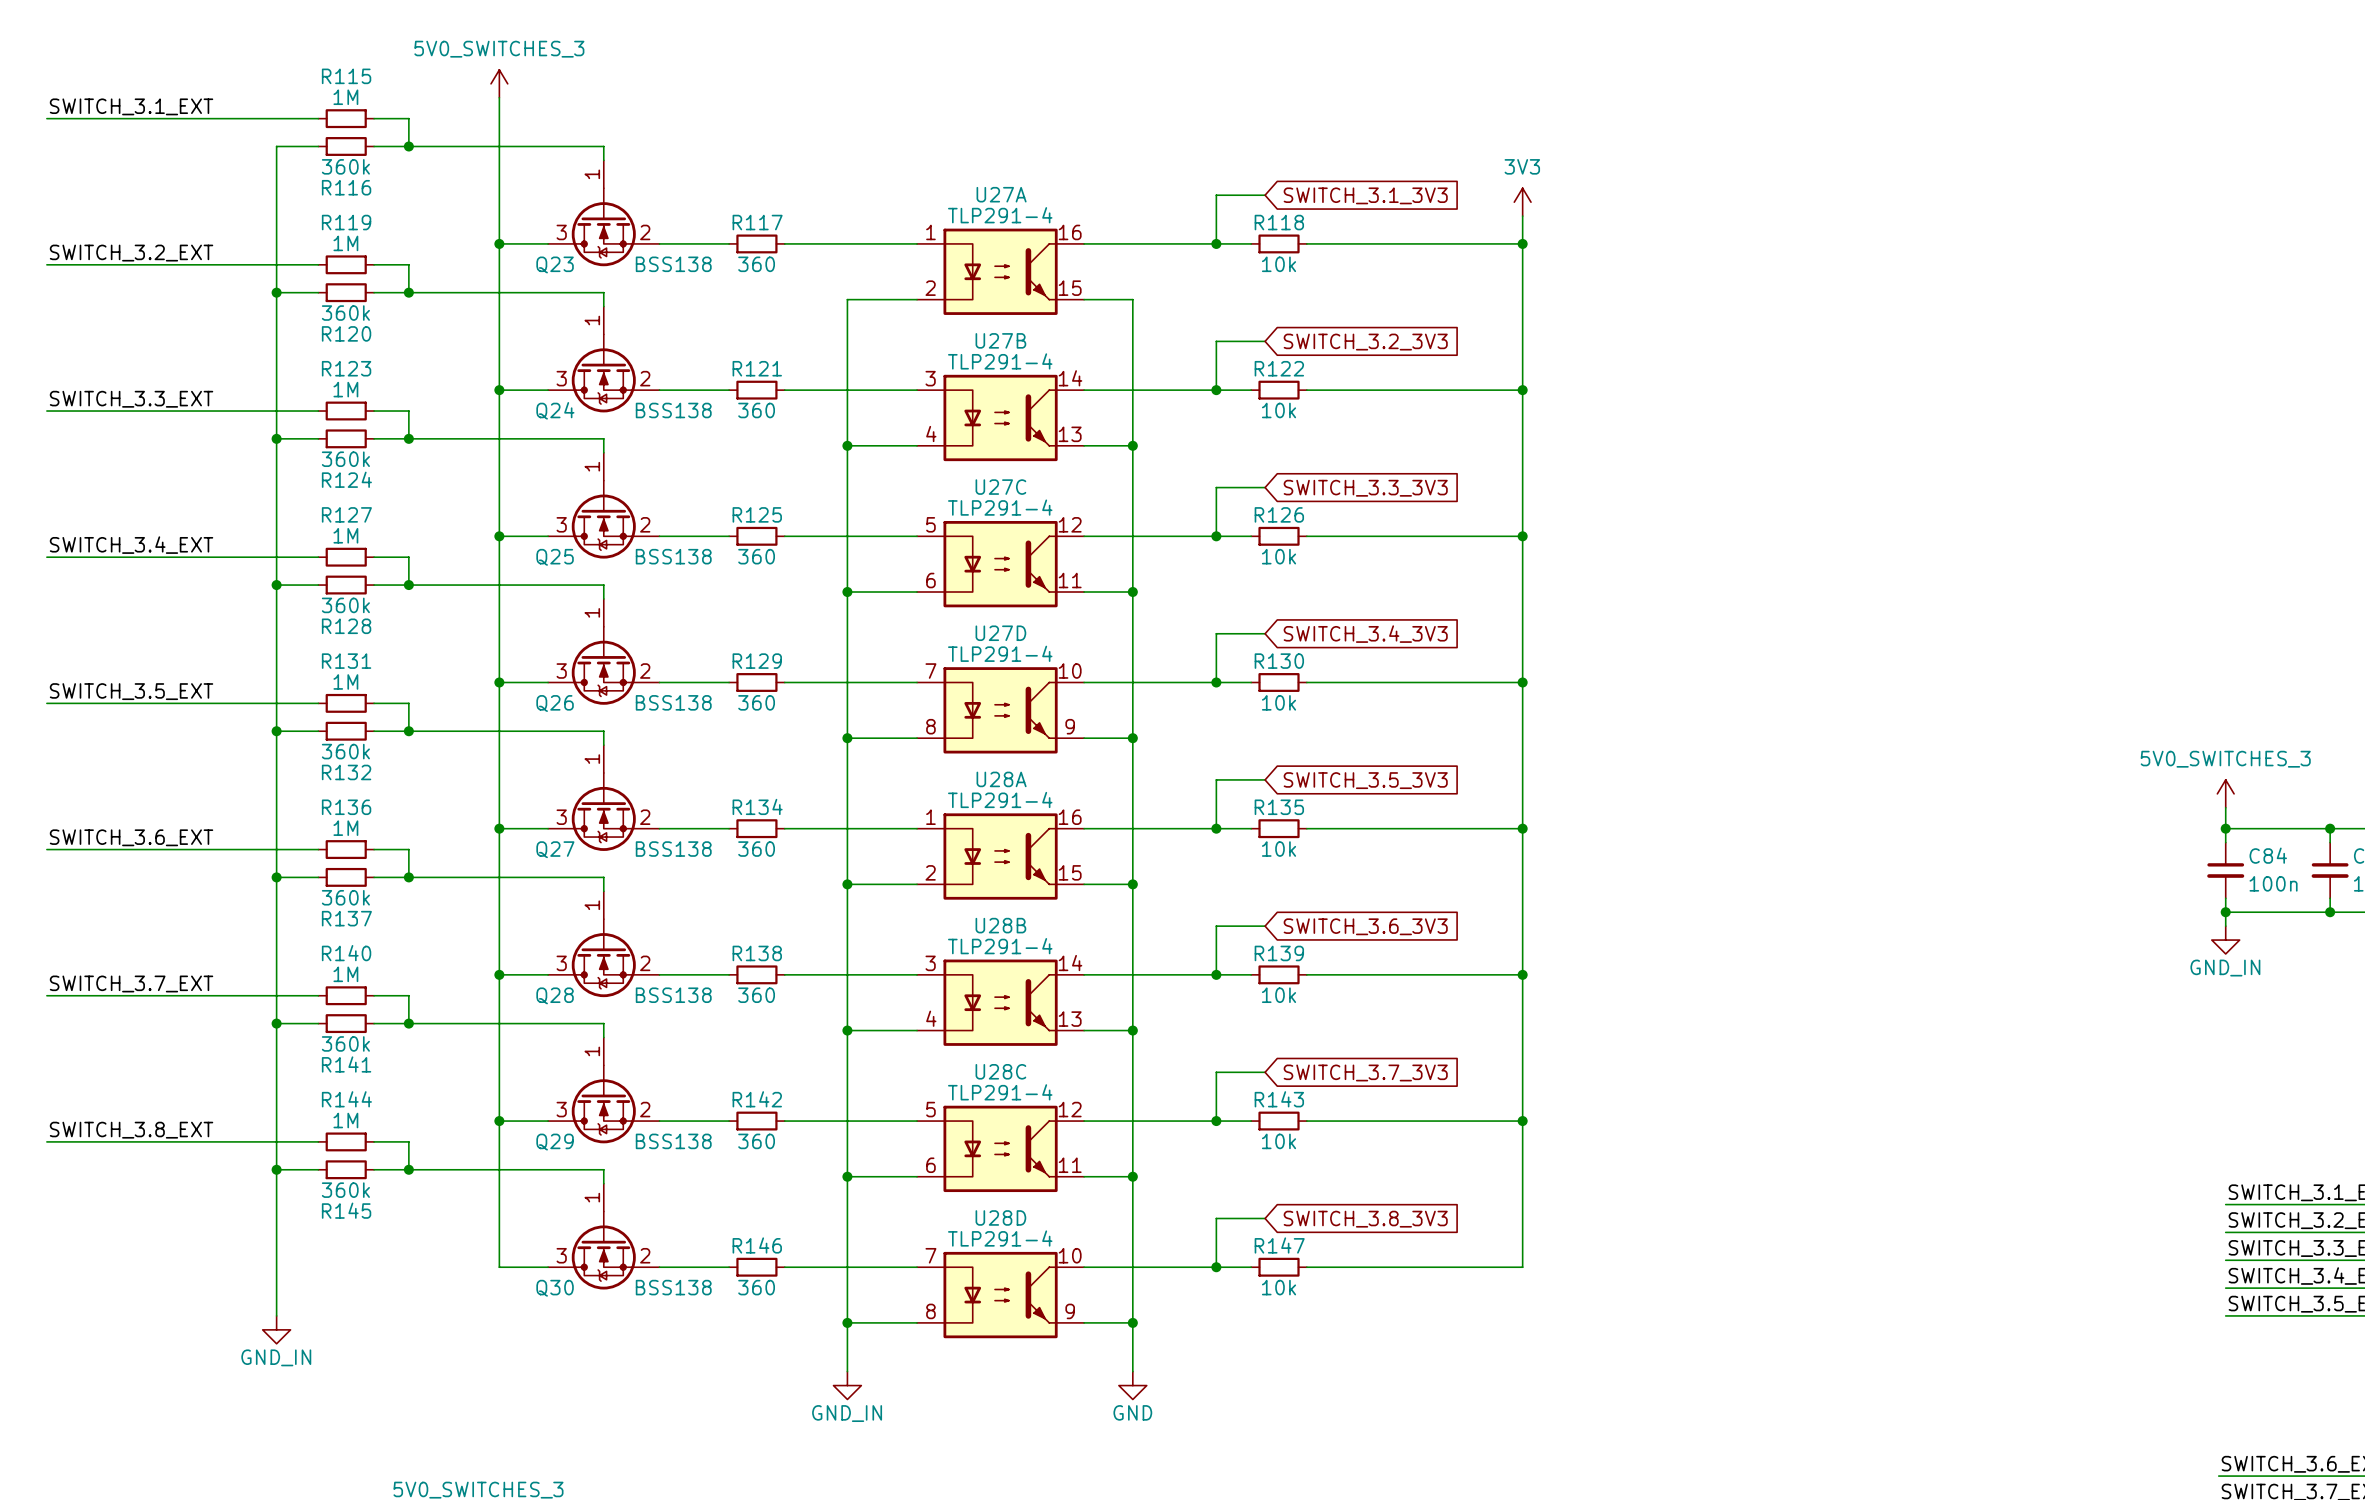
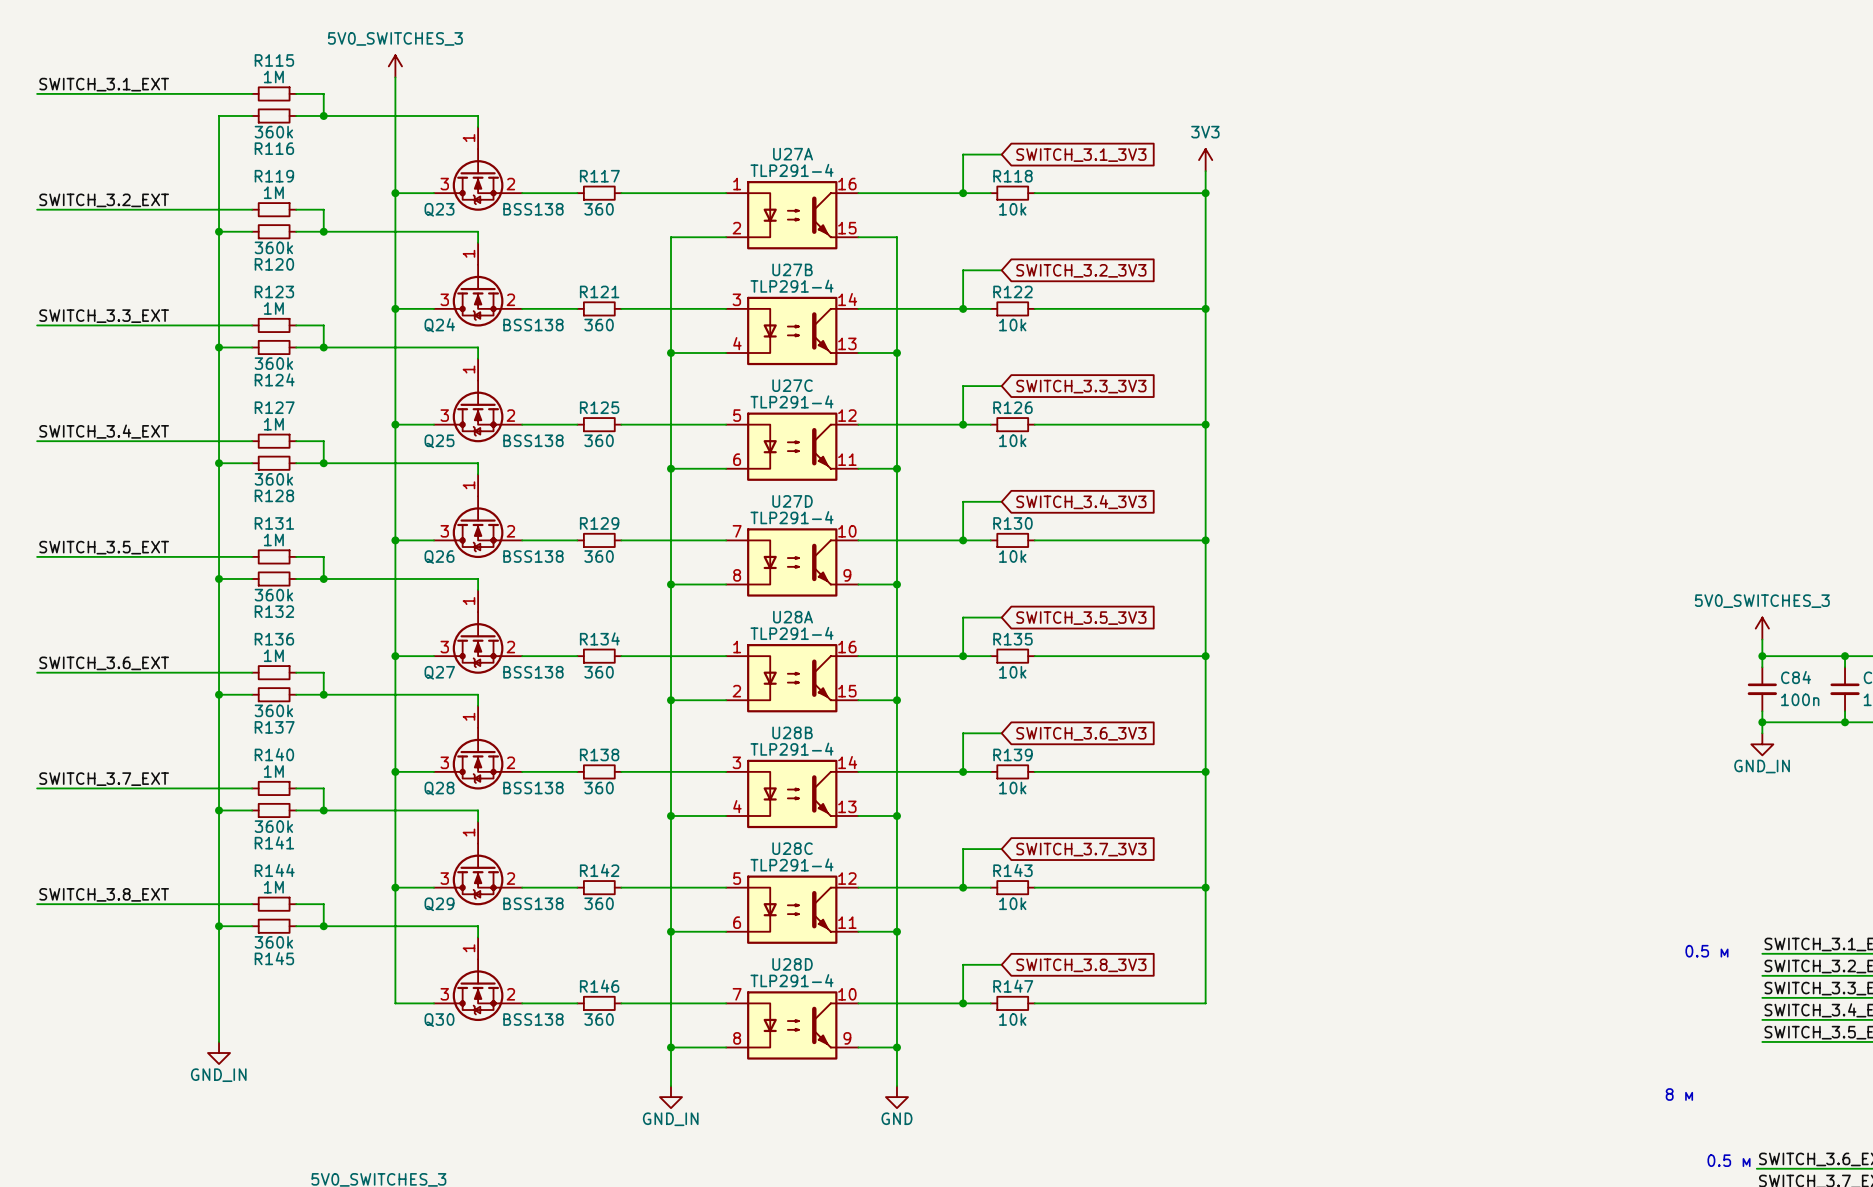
text: none -> 0.5 м (1706, 951)
text: none -> 8 м (1679, 1094)
text: none -> 0.5 м (1729, 1160)

